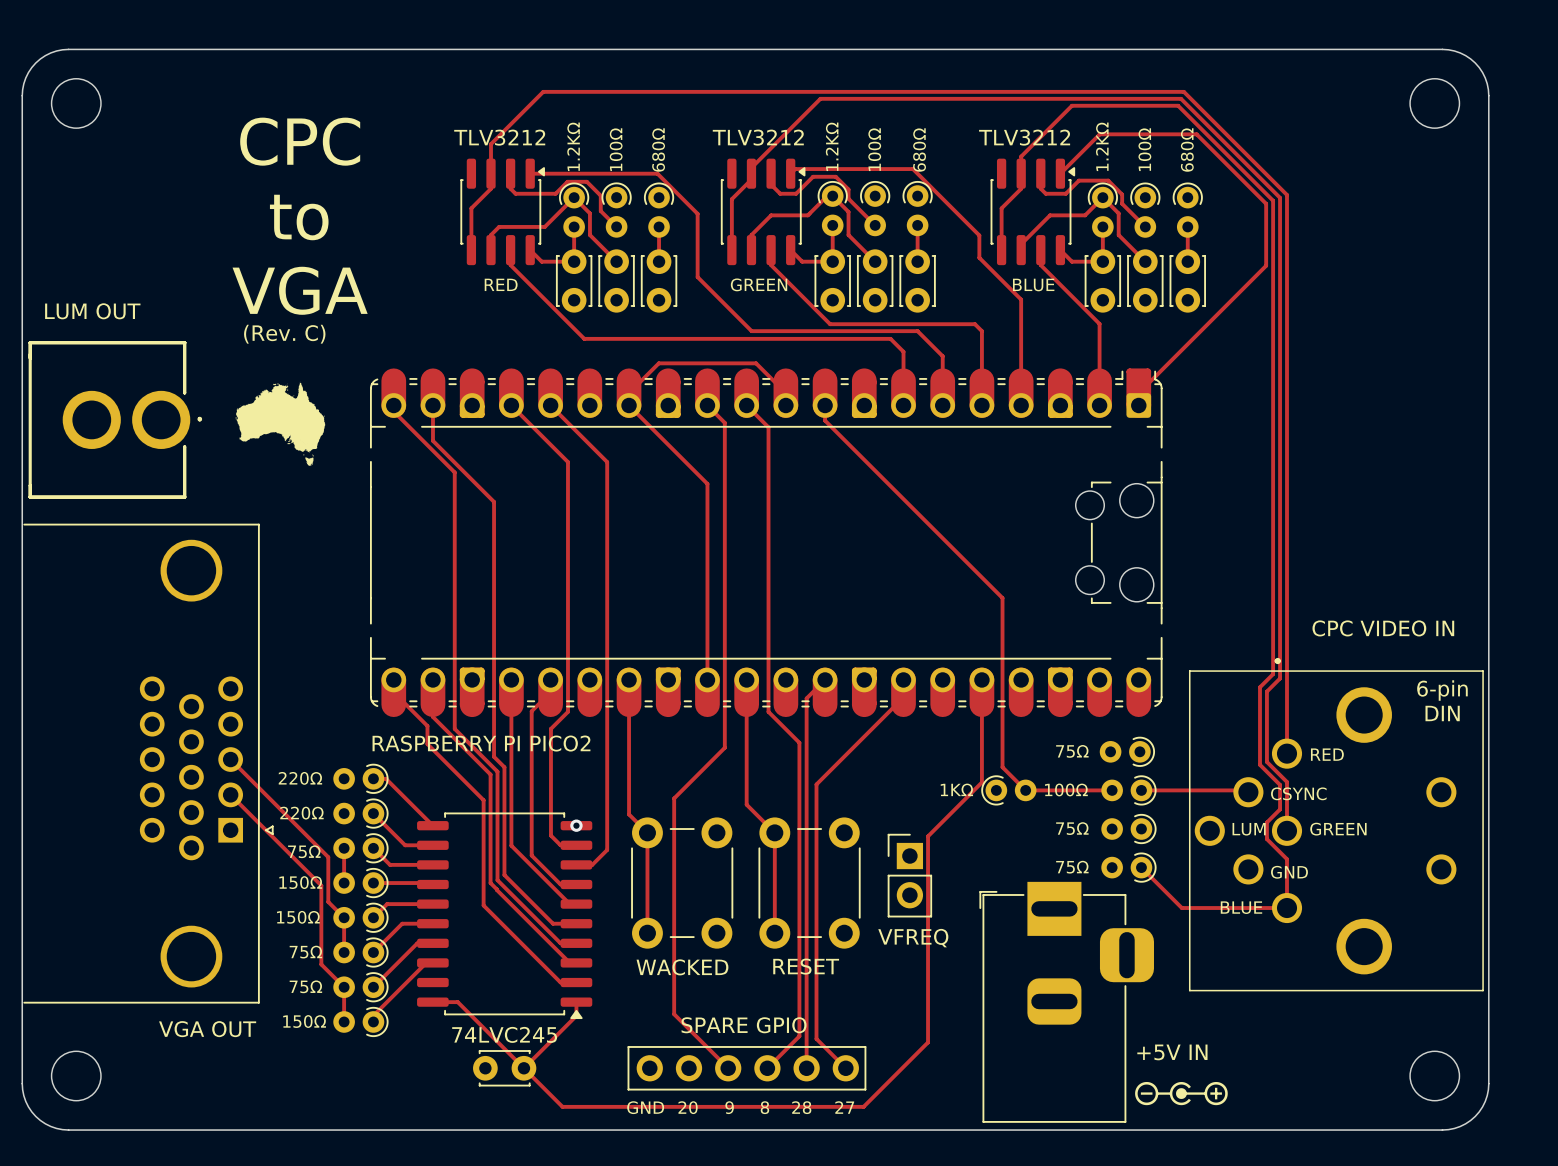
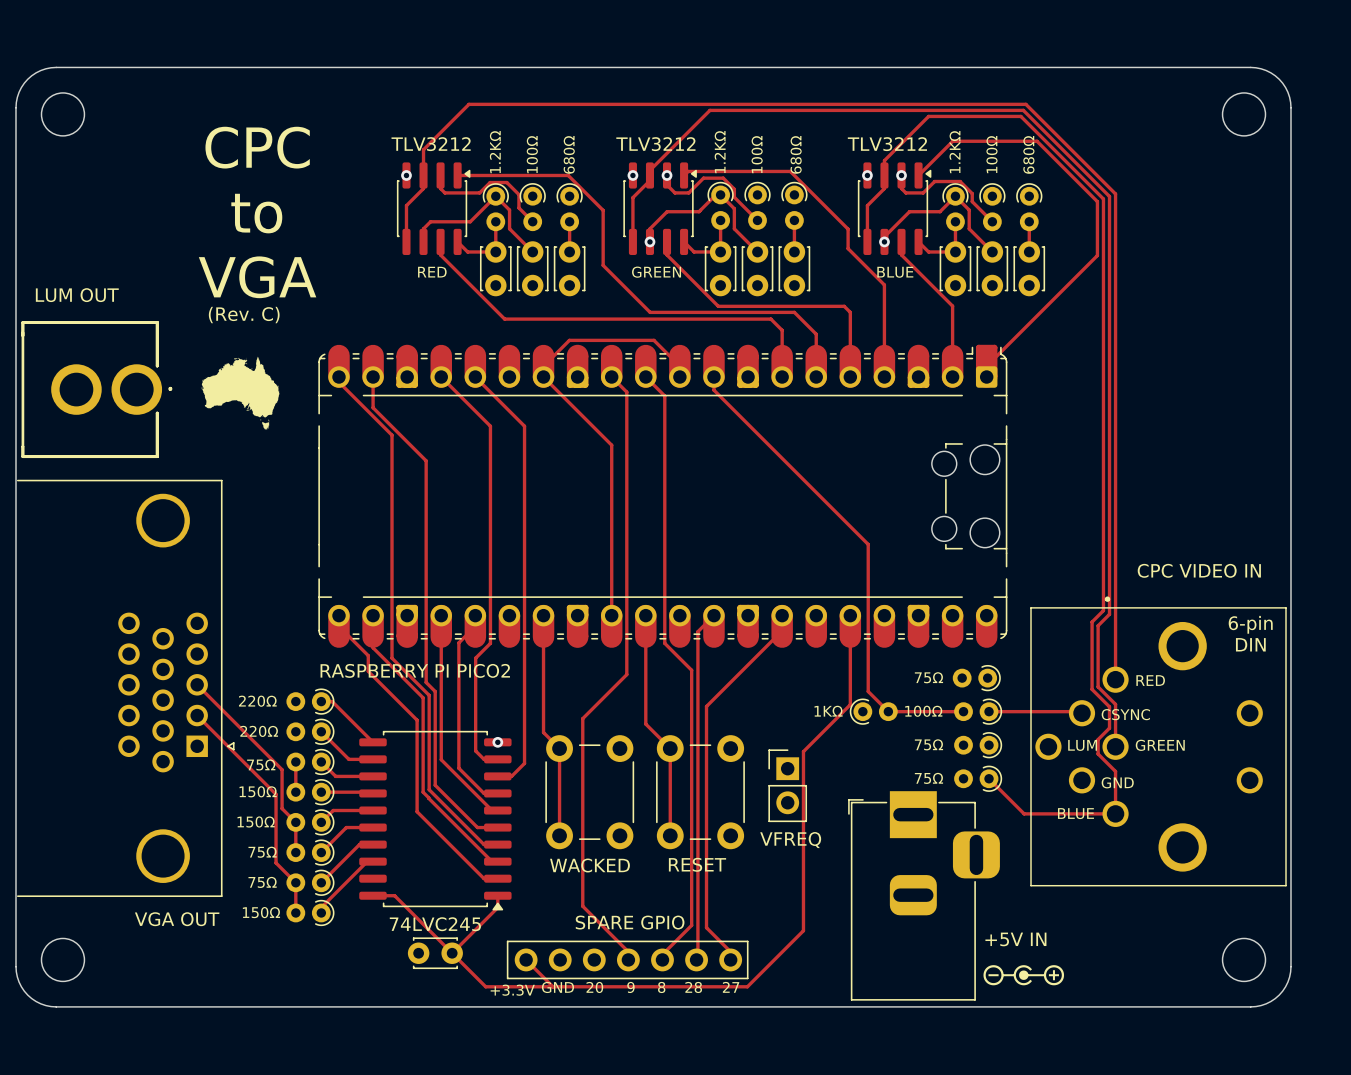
via: none -> (406, 175)
via: none -> (632, 175)
via: none -> (667, 175)
via: none -> (867, 175)
via: none -> (901, 175)
via: none -> (649, 241)
via: none -> (884, 241)
part: SPARE GPIO (746, 1068) -> none
track: none -> (526, 959) (552, 986)
part: none -> SPARE GPIO (627, 959)
text: none -> +3.3V (512, 990)

